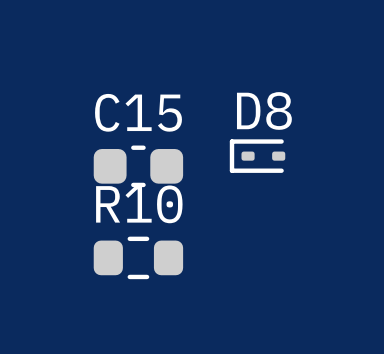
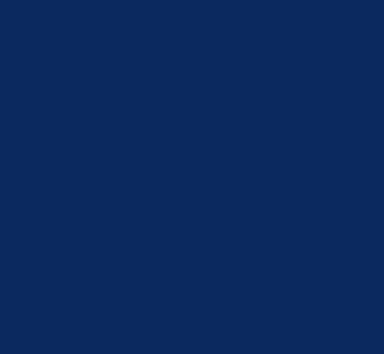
D8: (257, 156) -> none
C15: (138, 166) -> none
R10: (138, 257) -> none

